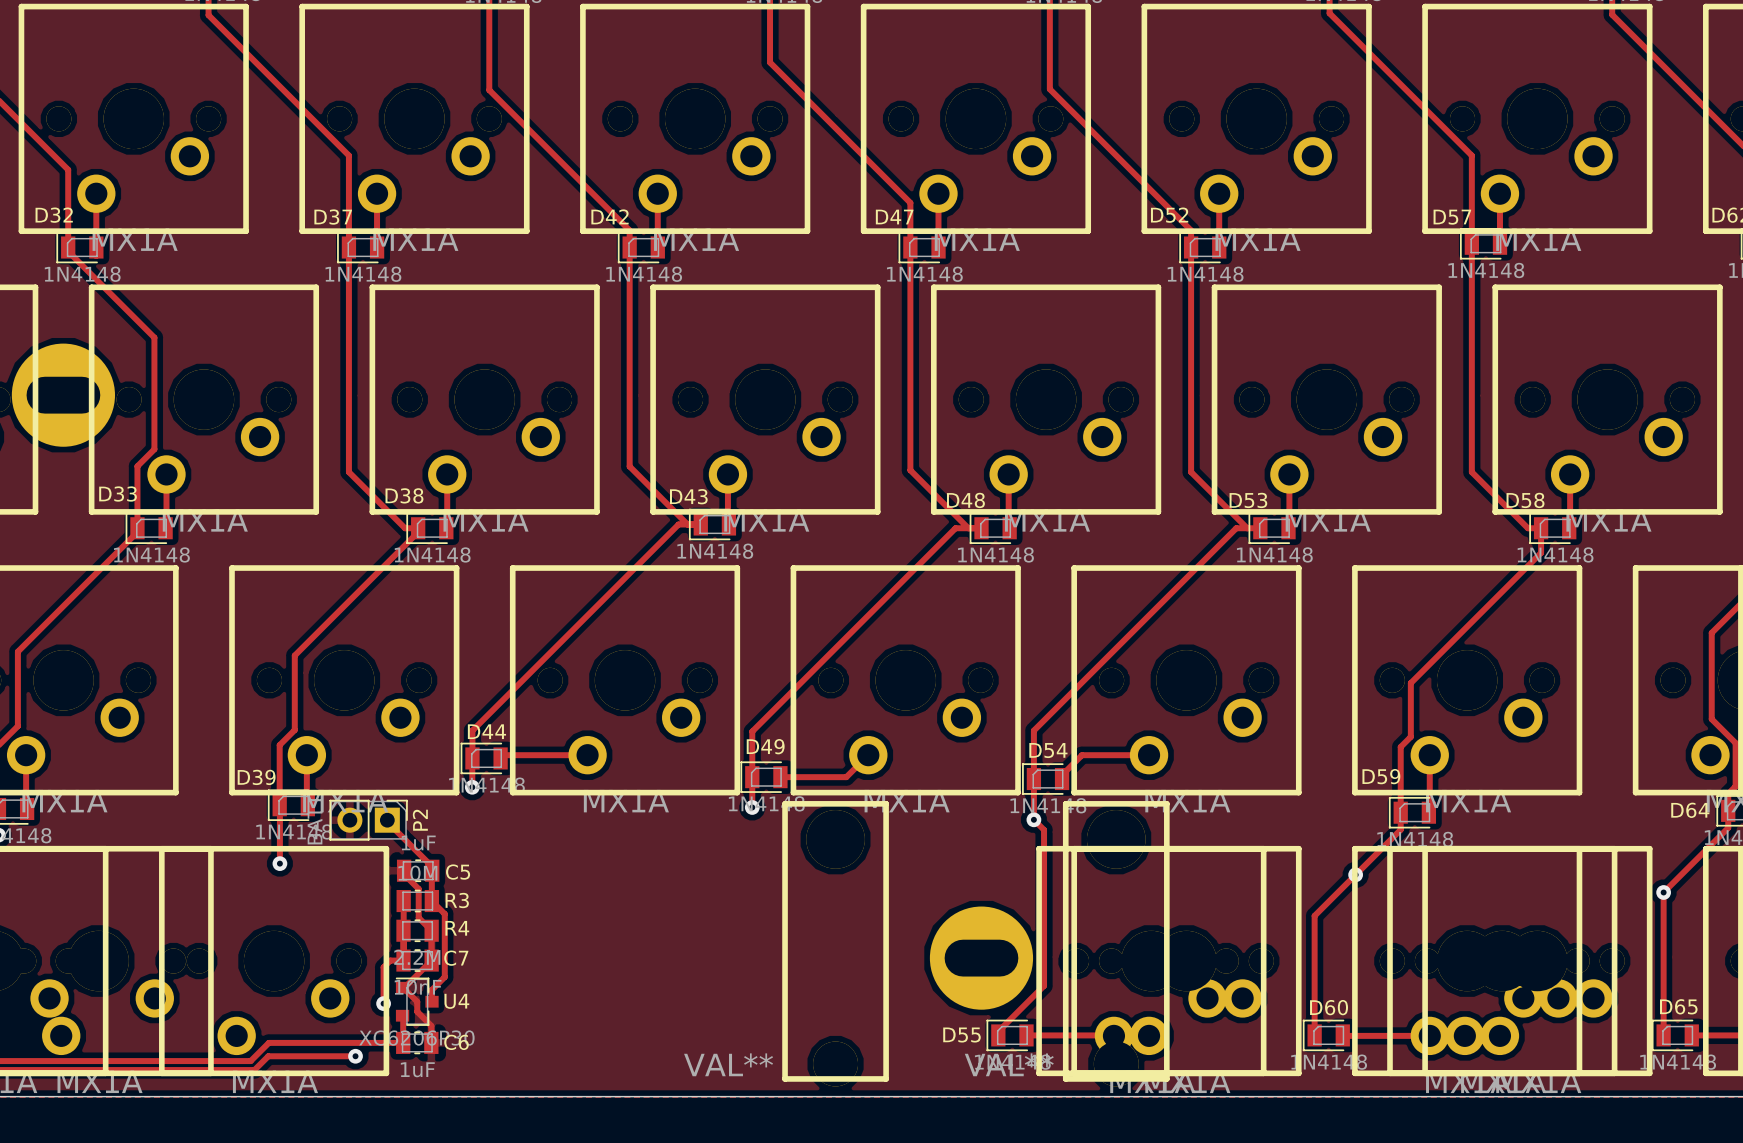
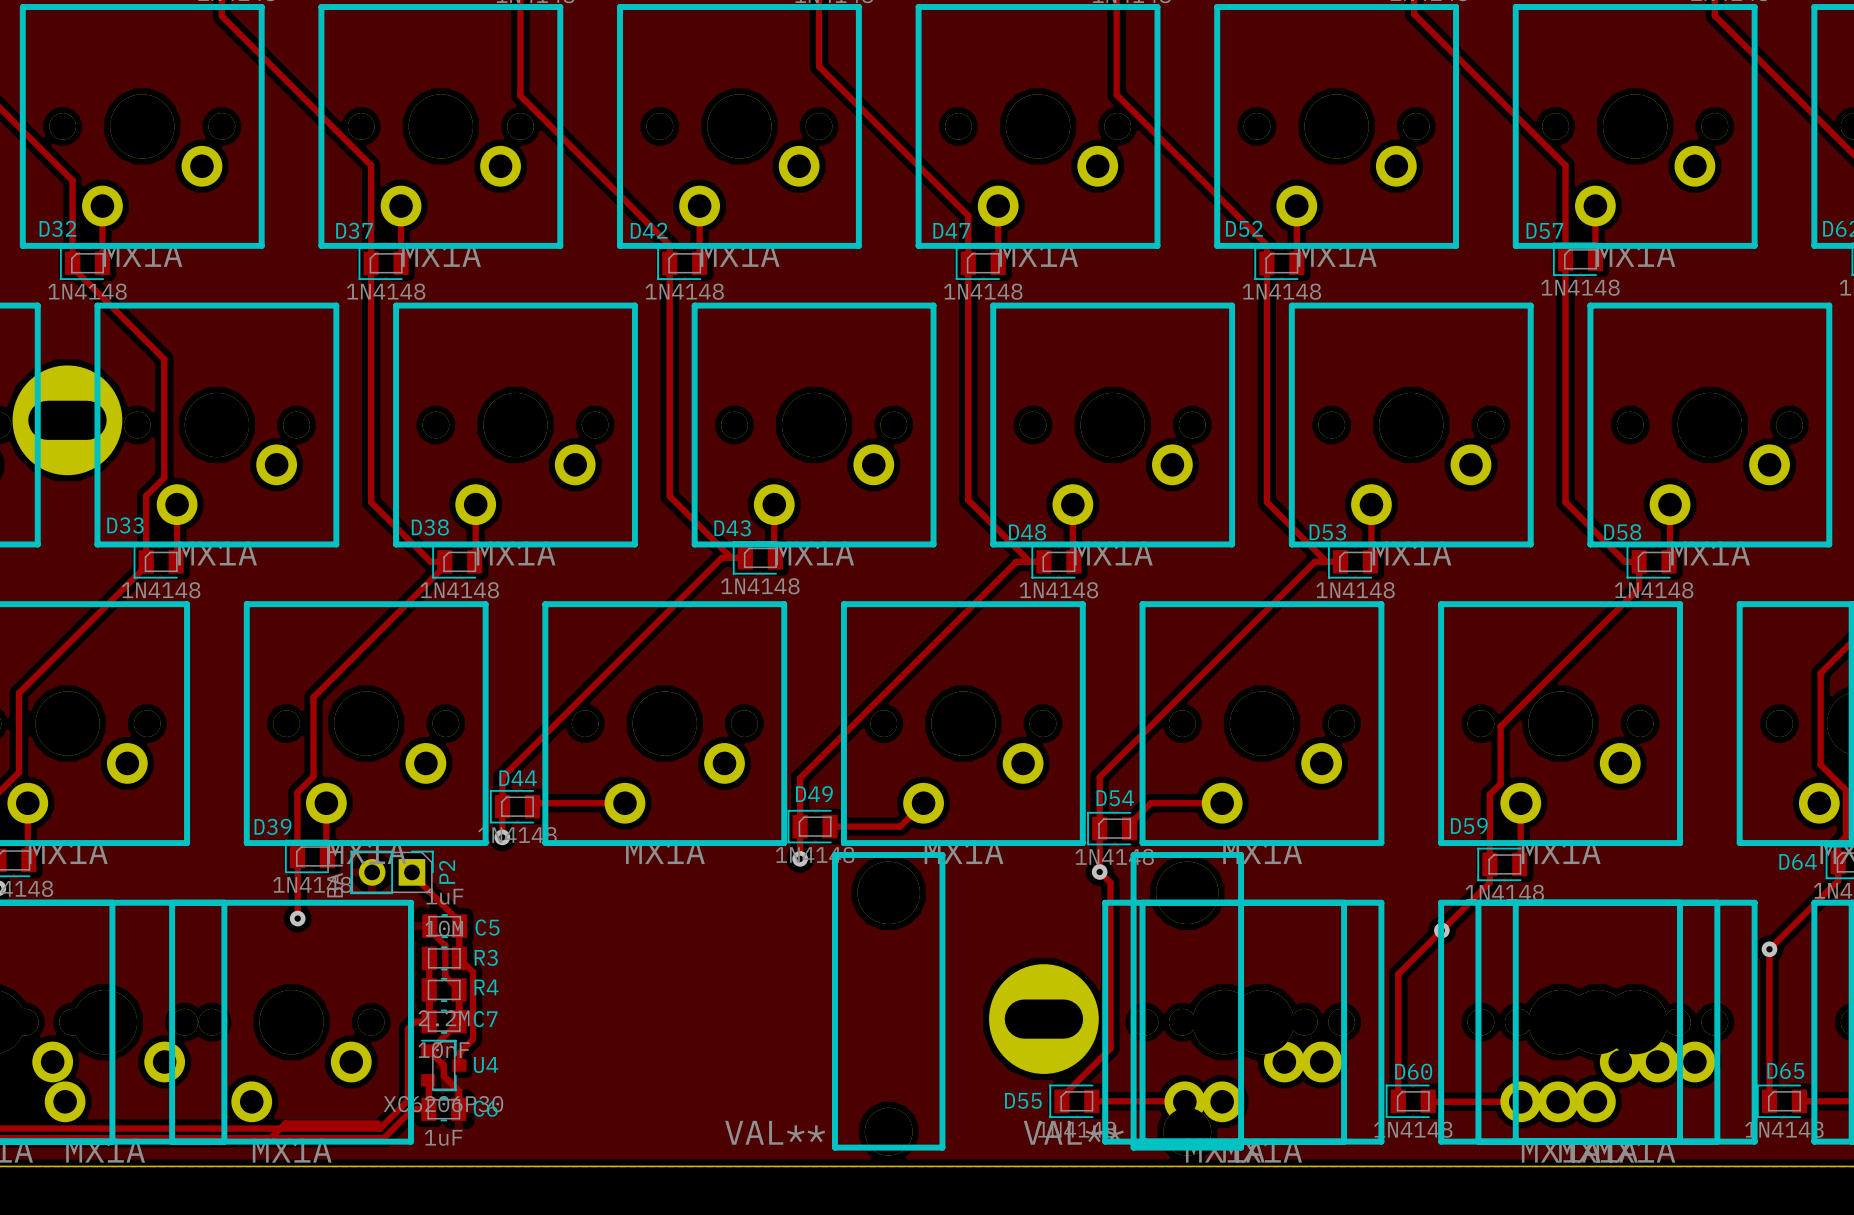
track: none -> (408, 1067) (408, 1100) (380, 1128) (266, 1128)
via: (383, 1003) -> none
track: (388, 1042) (268, 1042) (250, 1061) -> (412, 1109) (384, 1138) (270, 1138)
via: (355, 1056) -> none

